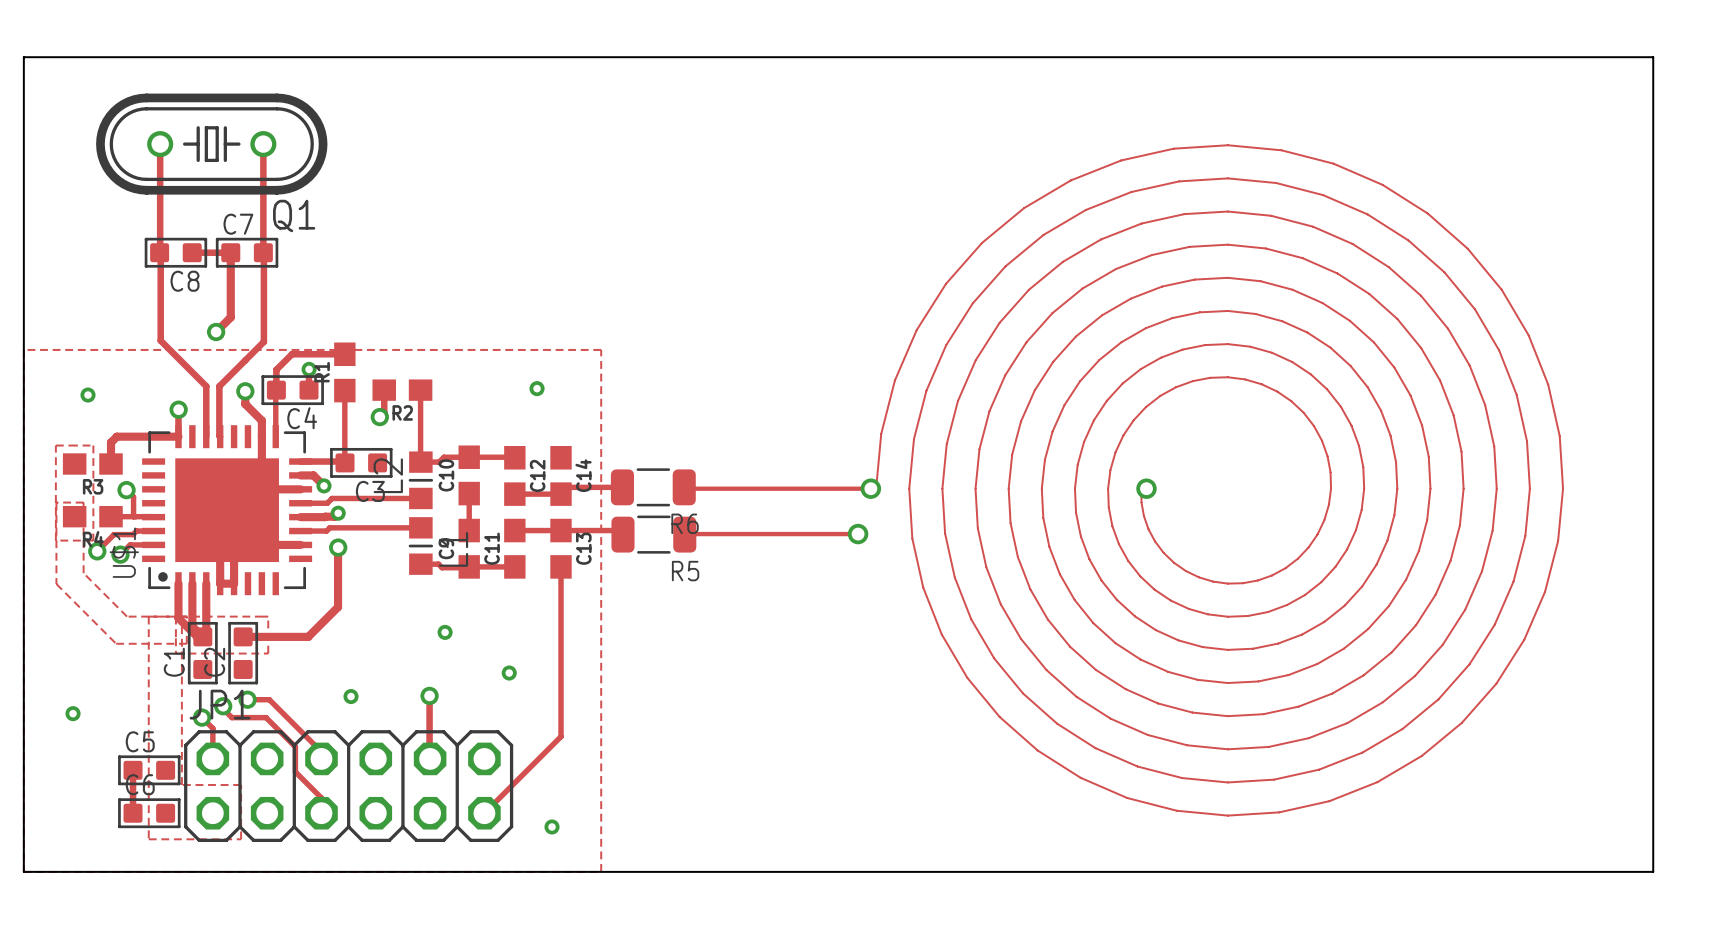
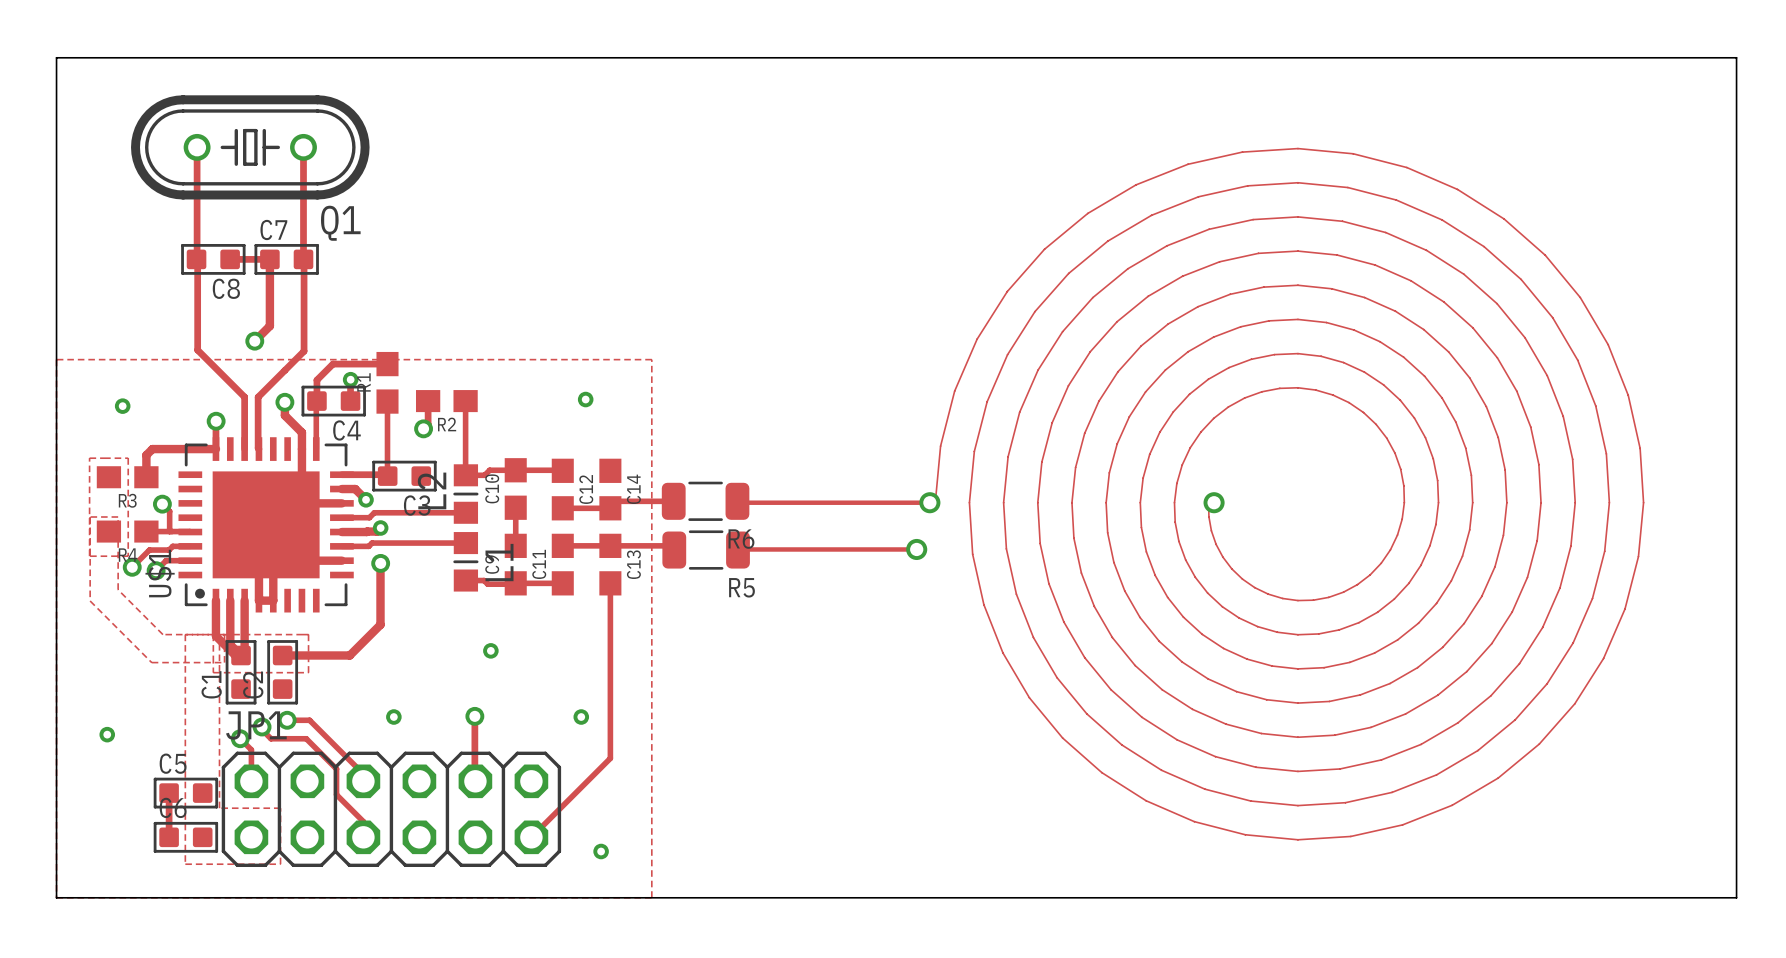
via position: (509, 673) -> (581, 717)

